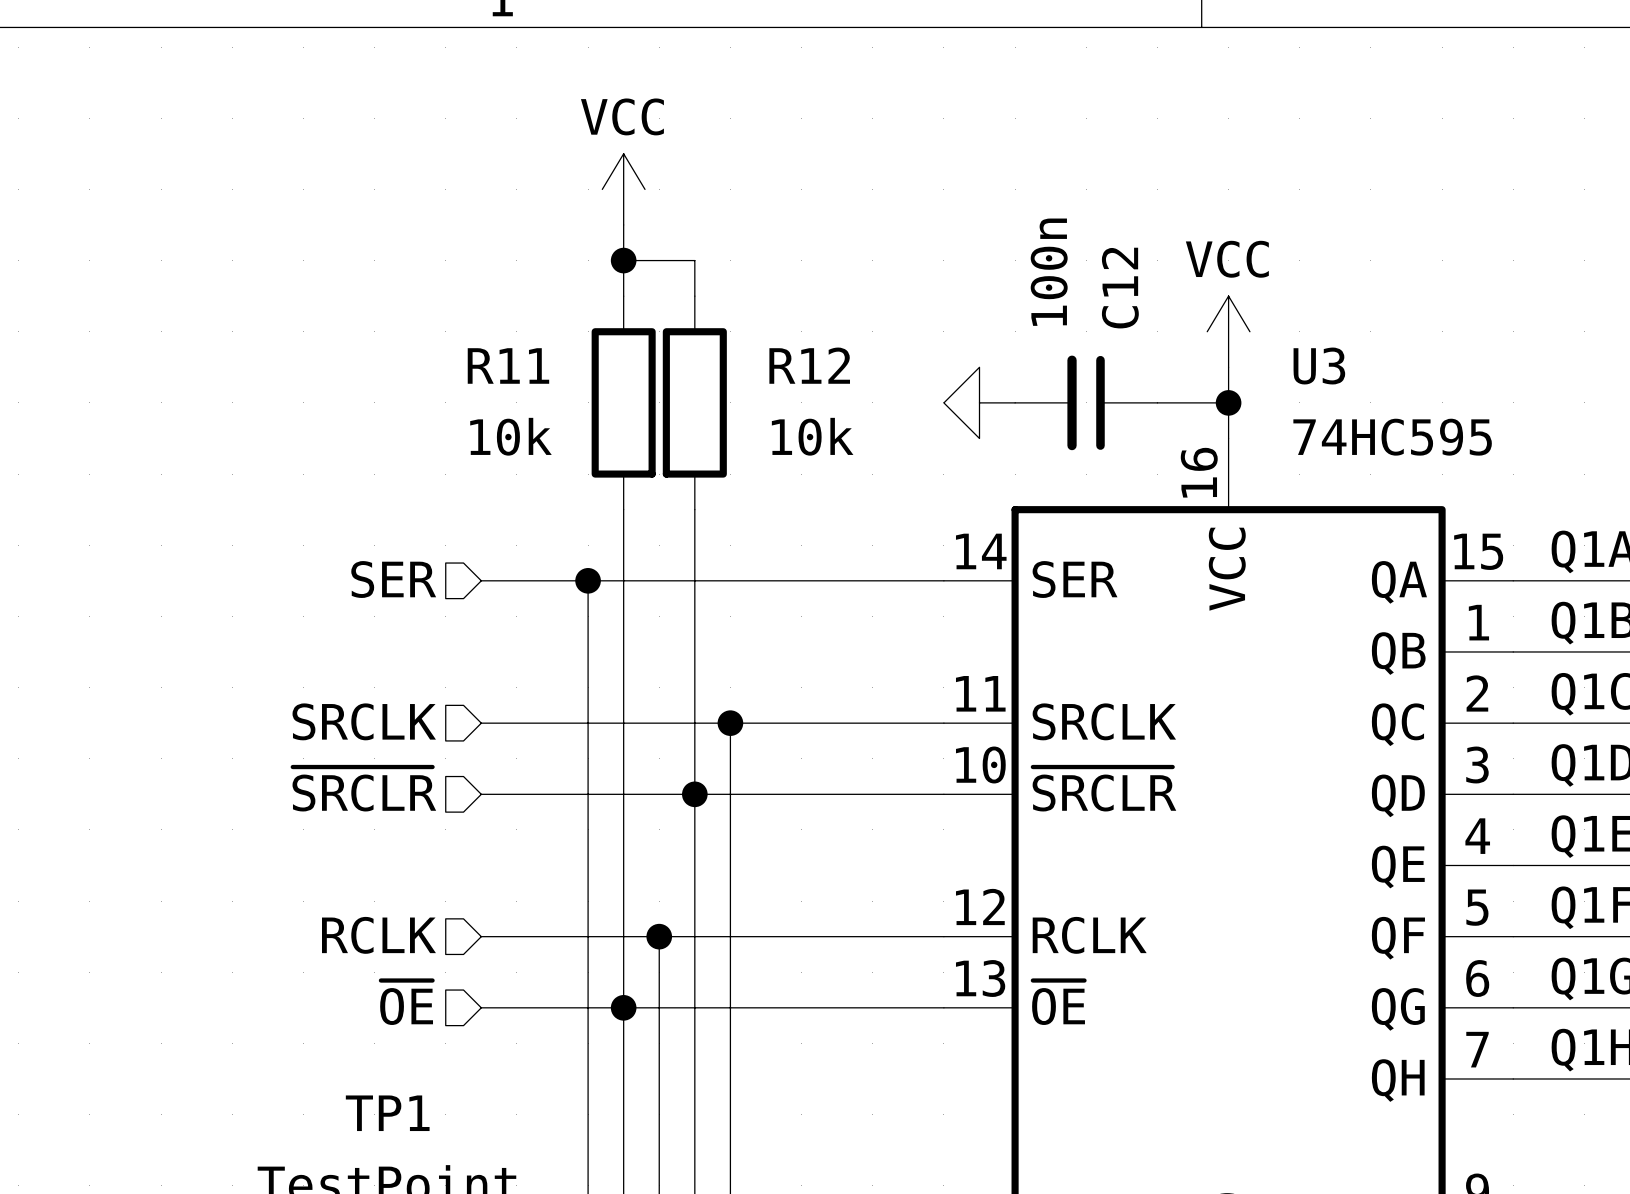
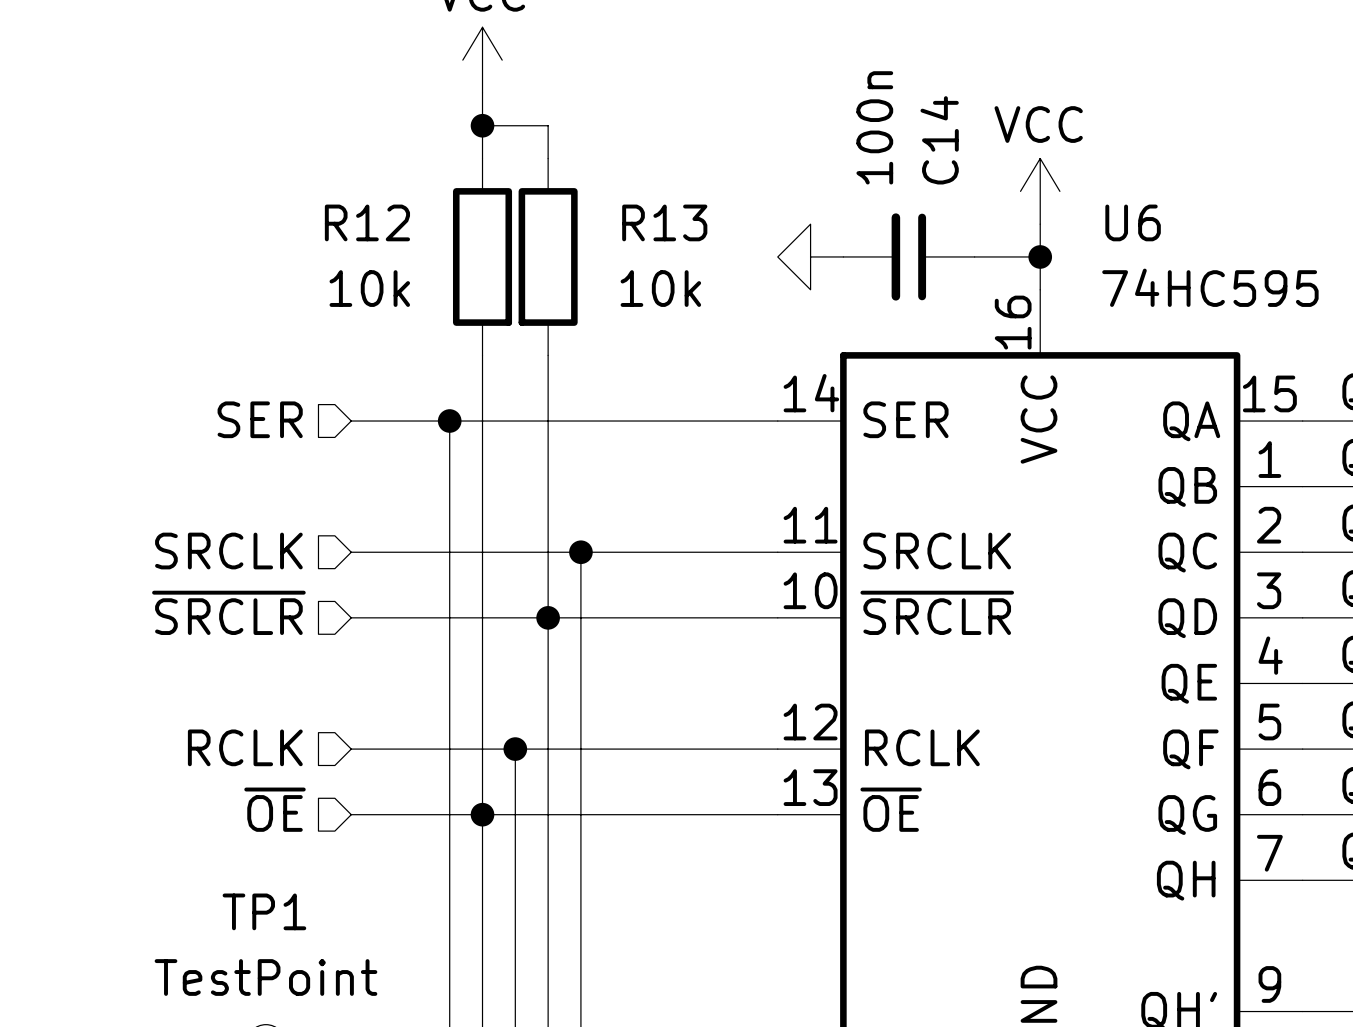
C12 name: C12 (1120, 288) -> C14 (939, 140)
R11 name: R11 (508, 365) -> R12 (367, 222)
R12 name: R12 (809, 365) -> R13 (664, 222)
U3 name: U3 (1319, 366) -> U6 (1133, 222)

